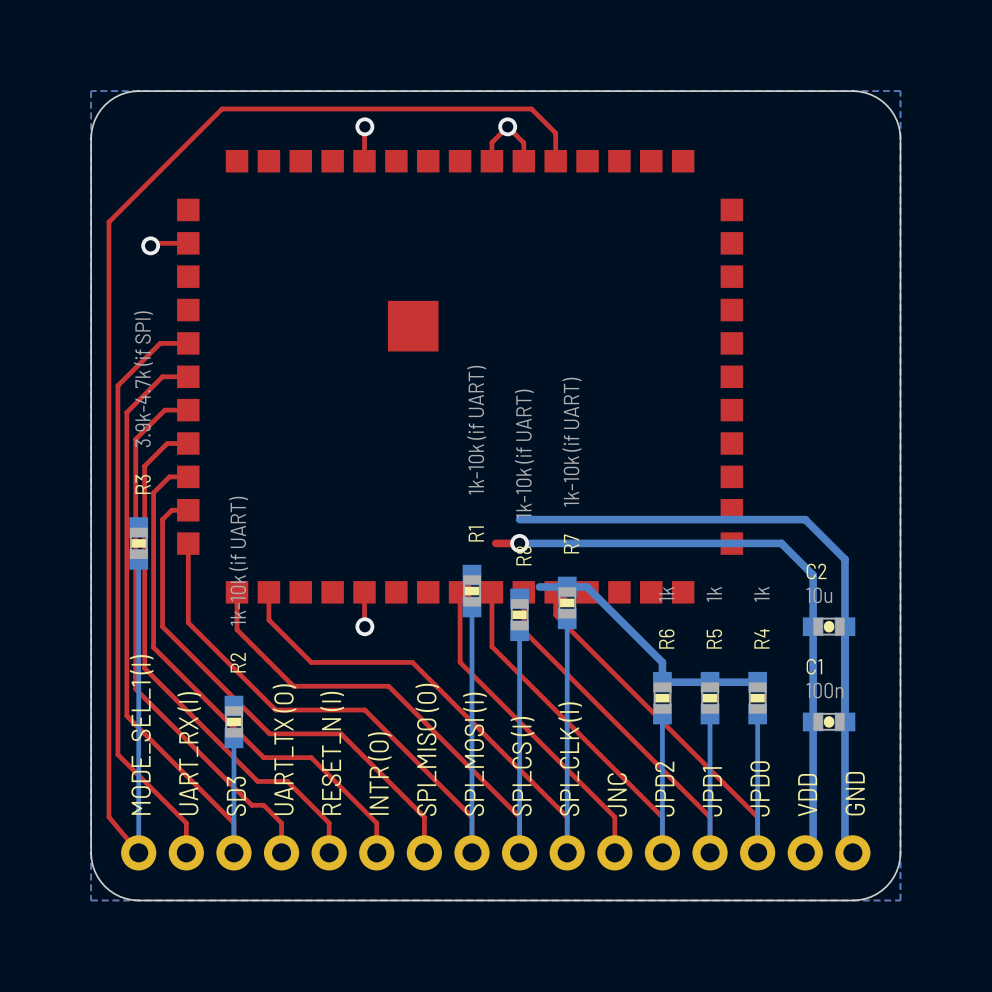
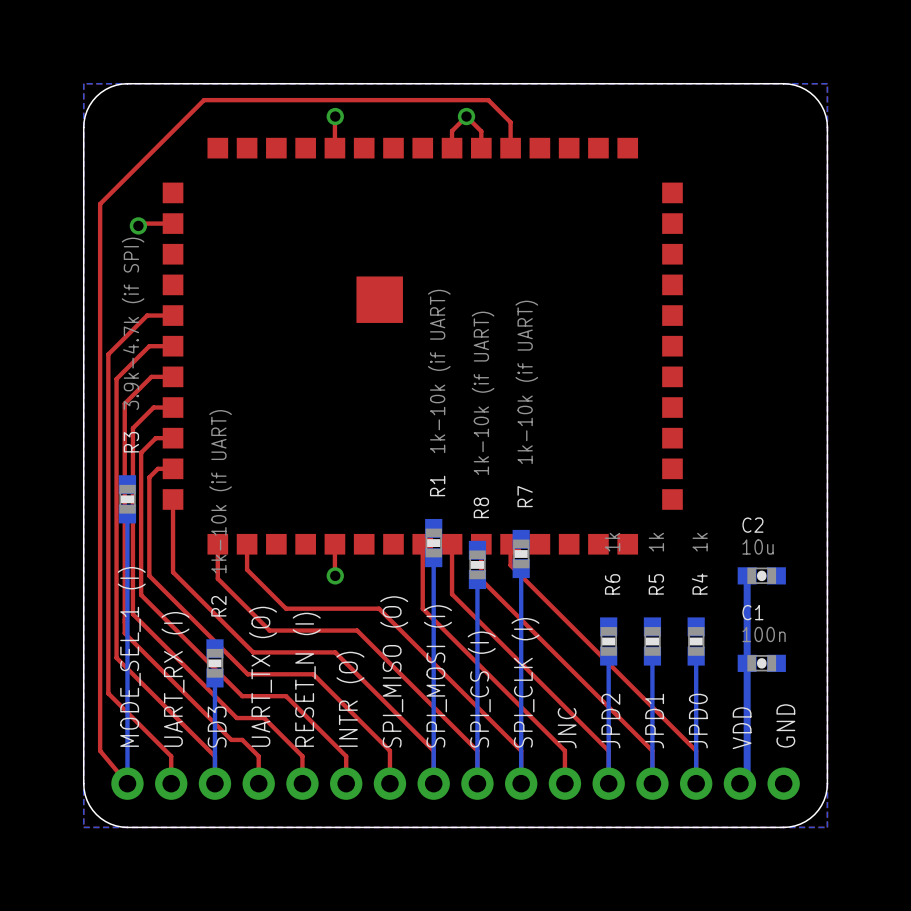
bottom track: (519, 519) (805, 519) (844, 559) (844, 844) (852, 852) -> none
top track: (519, 543) (495, 543) -> none
bottom track: (519, 543) (781, 543) (813, 575) (813, 626) -> none
via: (519, 543) -> none
bottom track: (539, 586) (586, 586) (662, 662) (662, 682) (757, 682) -> none

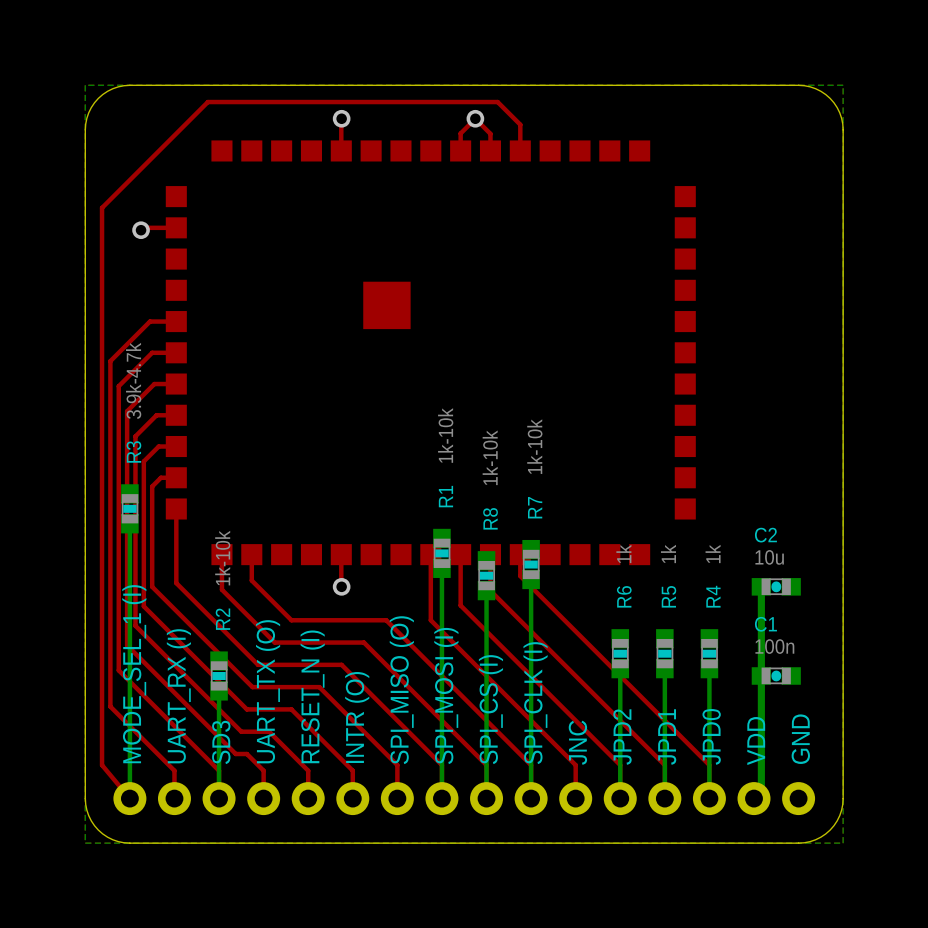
R3 value: 3.9k-4.7k (if SPI) (133, 323) -> 3.9k-4.7k (133, 380)
R1 value: 1k-10k (if UART) (439, 371) -> 1k-10k (445, 435)
R7 value: 1k-10k (if UART) (526, 382) -> 1k-10k (534, 446)
R8 value: 1k-10k (if UART) (483, 393) -> 1k-10k (490, 457)
R2 value: 1k-10k (if UART) (220, 491) -> 1k-10k (222, 558)

